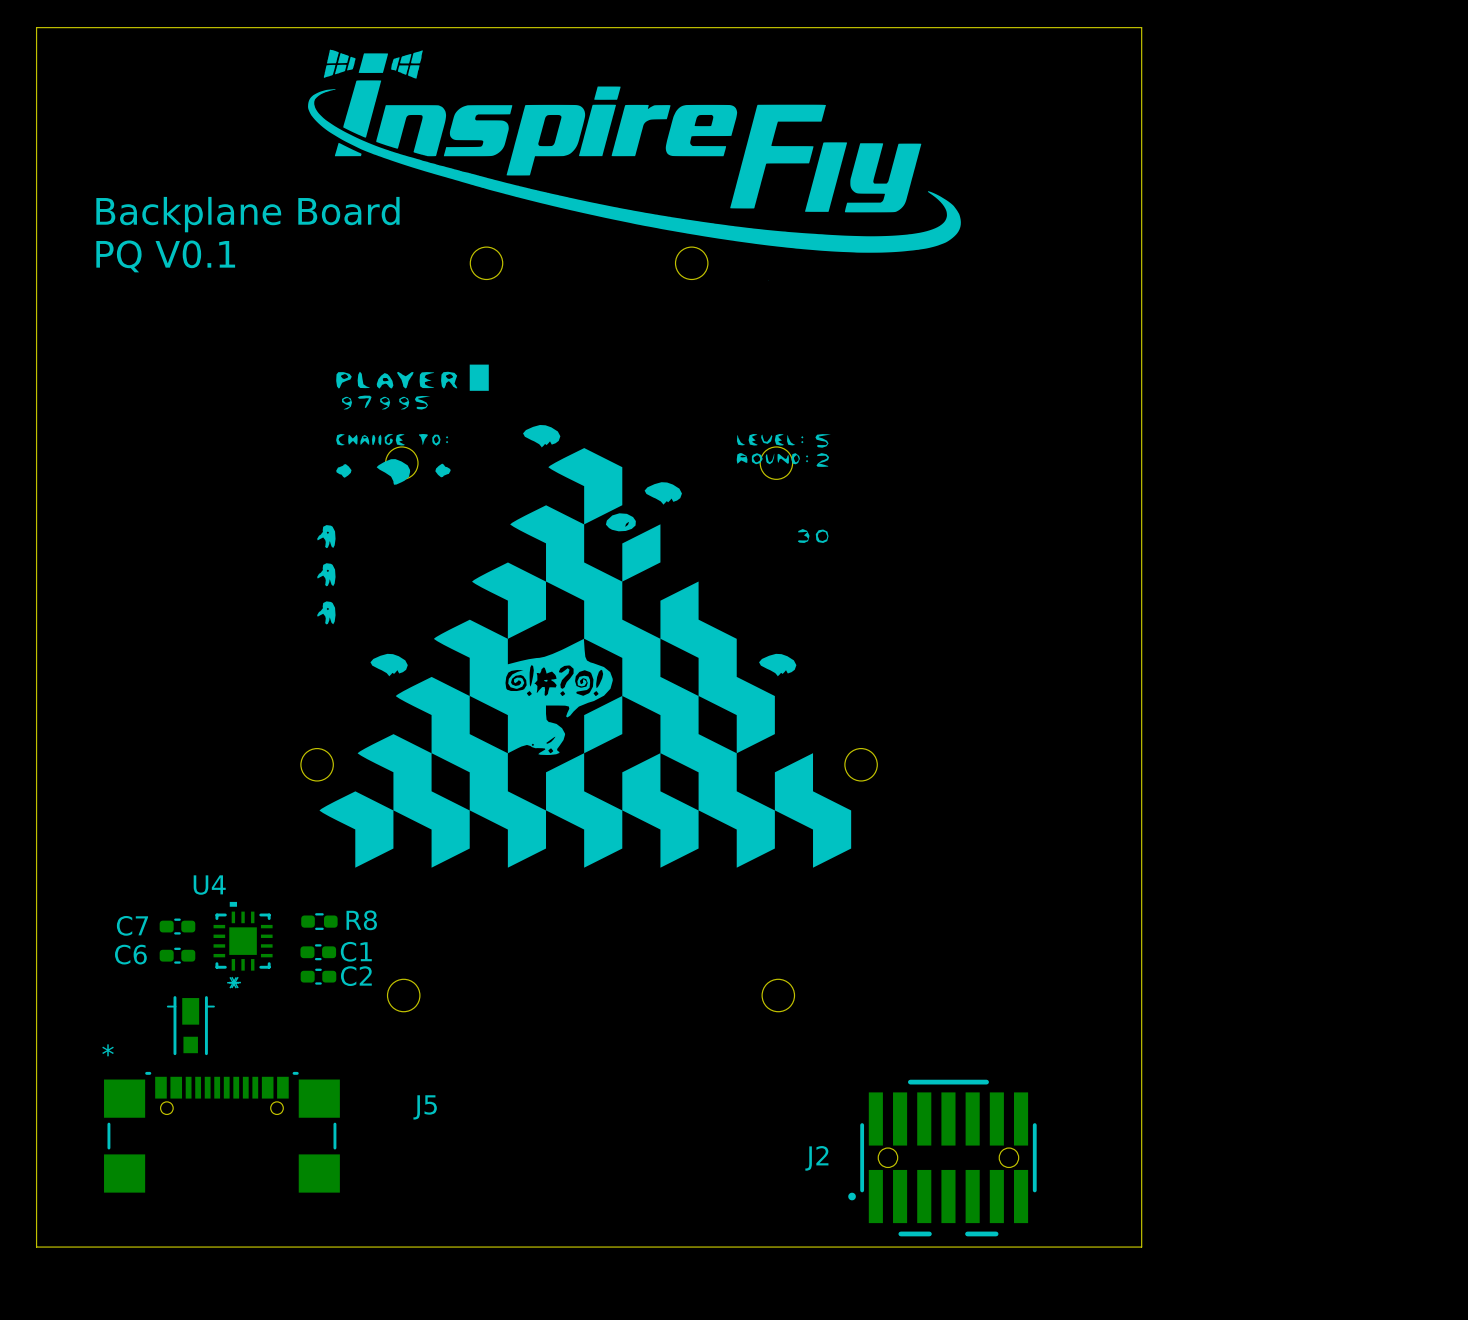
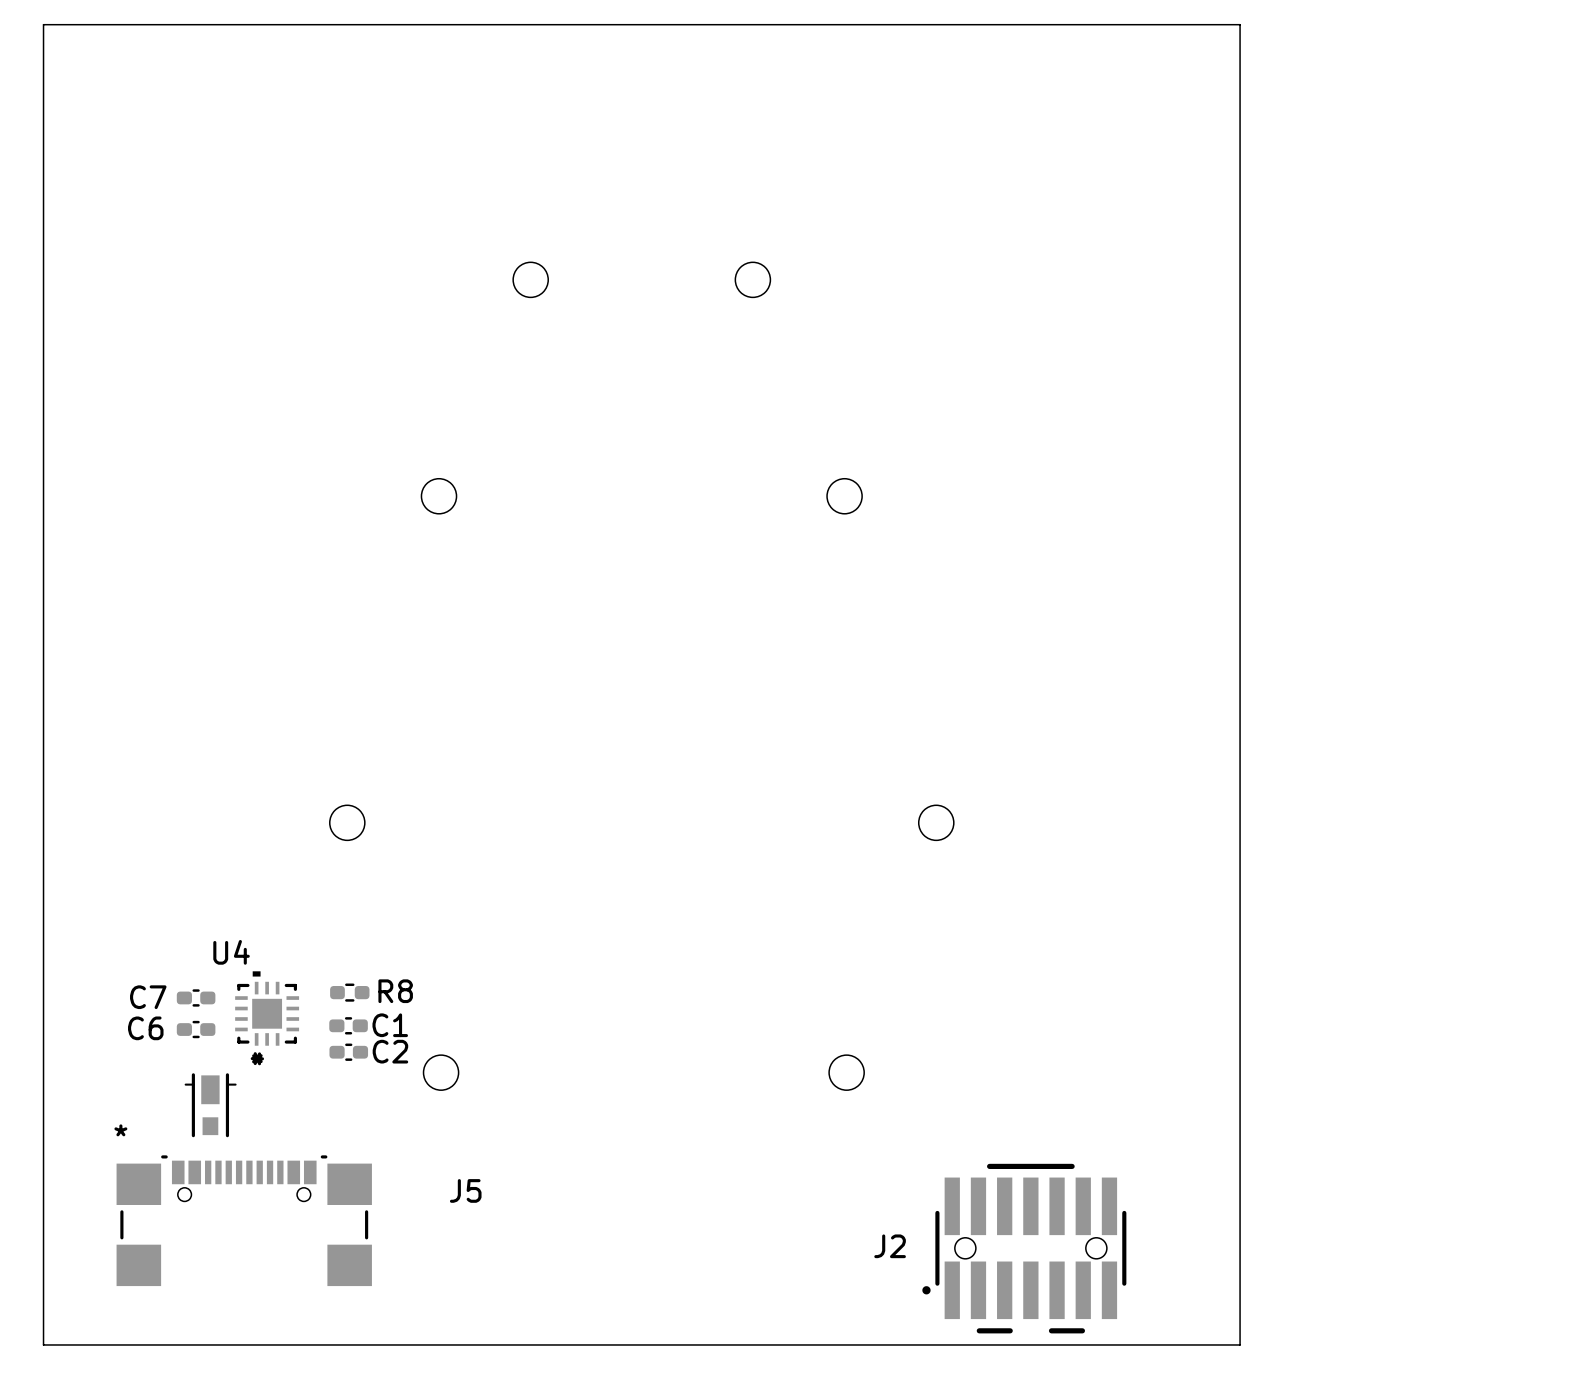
drawing: [308, 49, 961, 281] -> none
text: Backplane Board (247, 214) -> none
text: PQ V0.1 (165, 256) -> none
drawing: [317, 364, 852, 868] -> none

